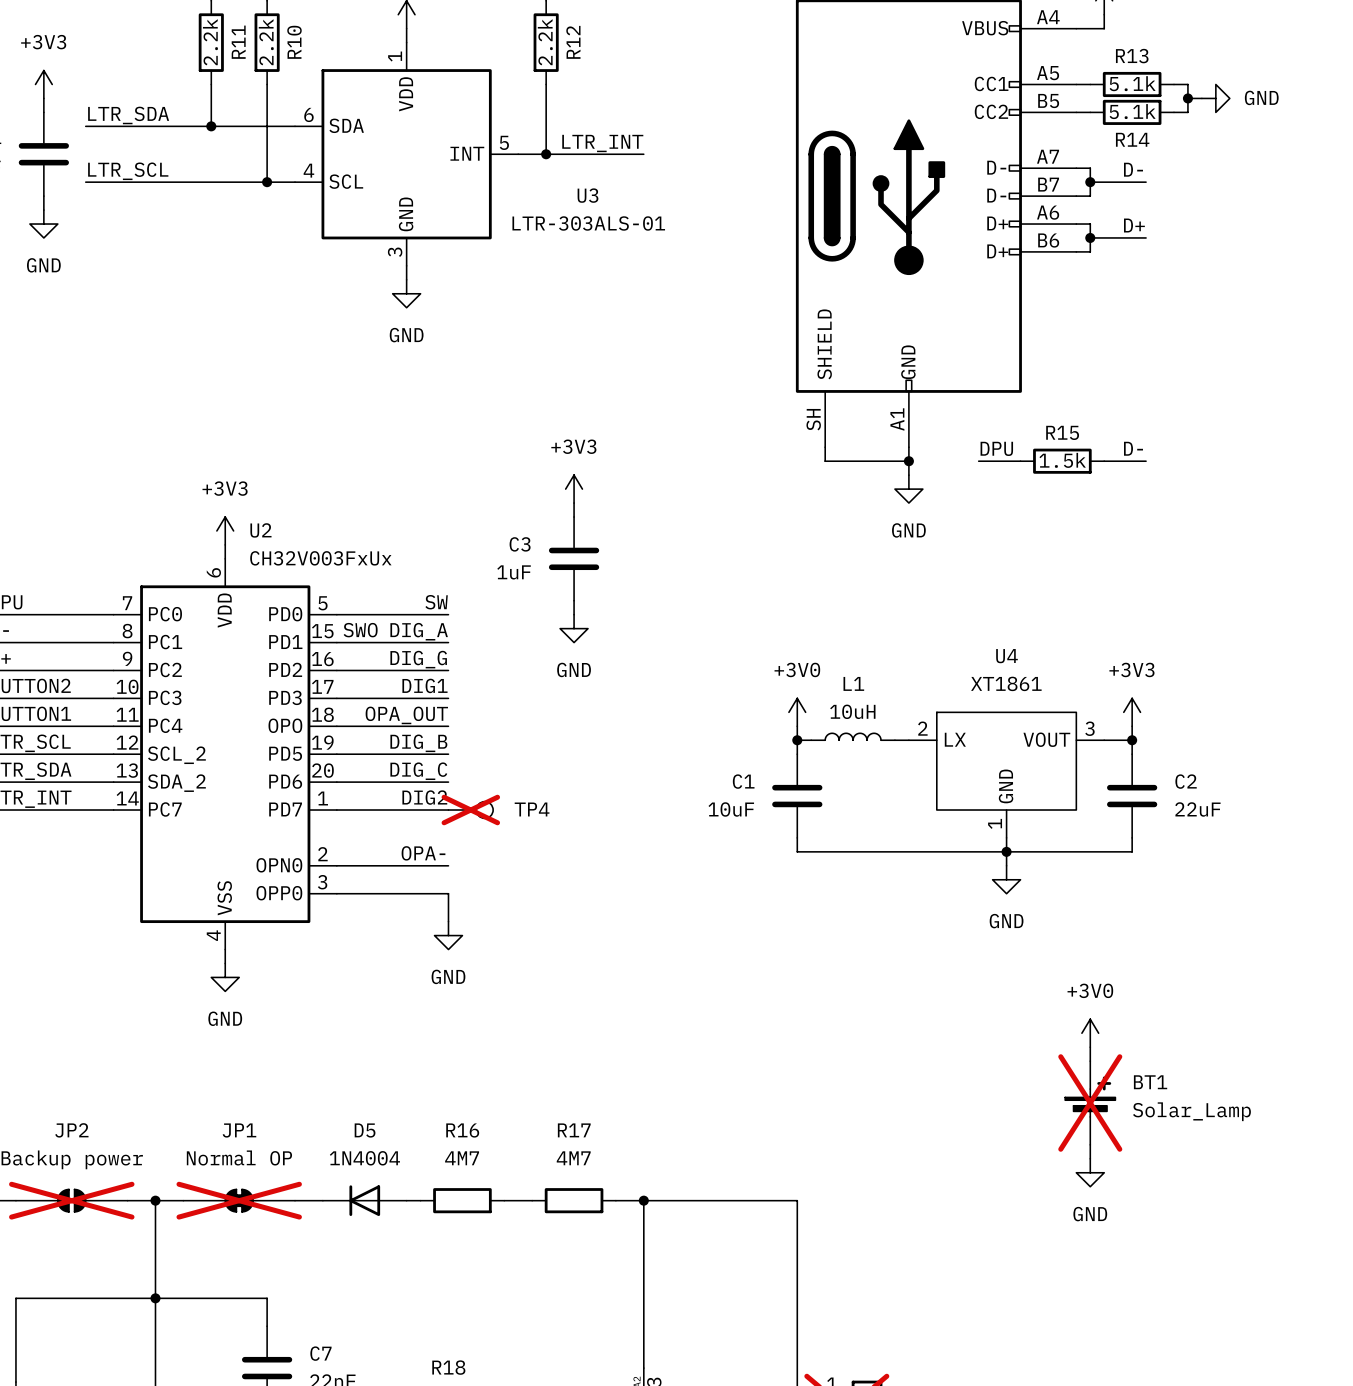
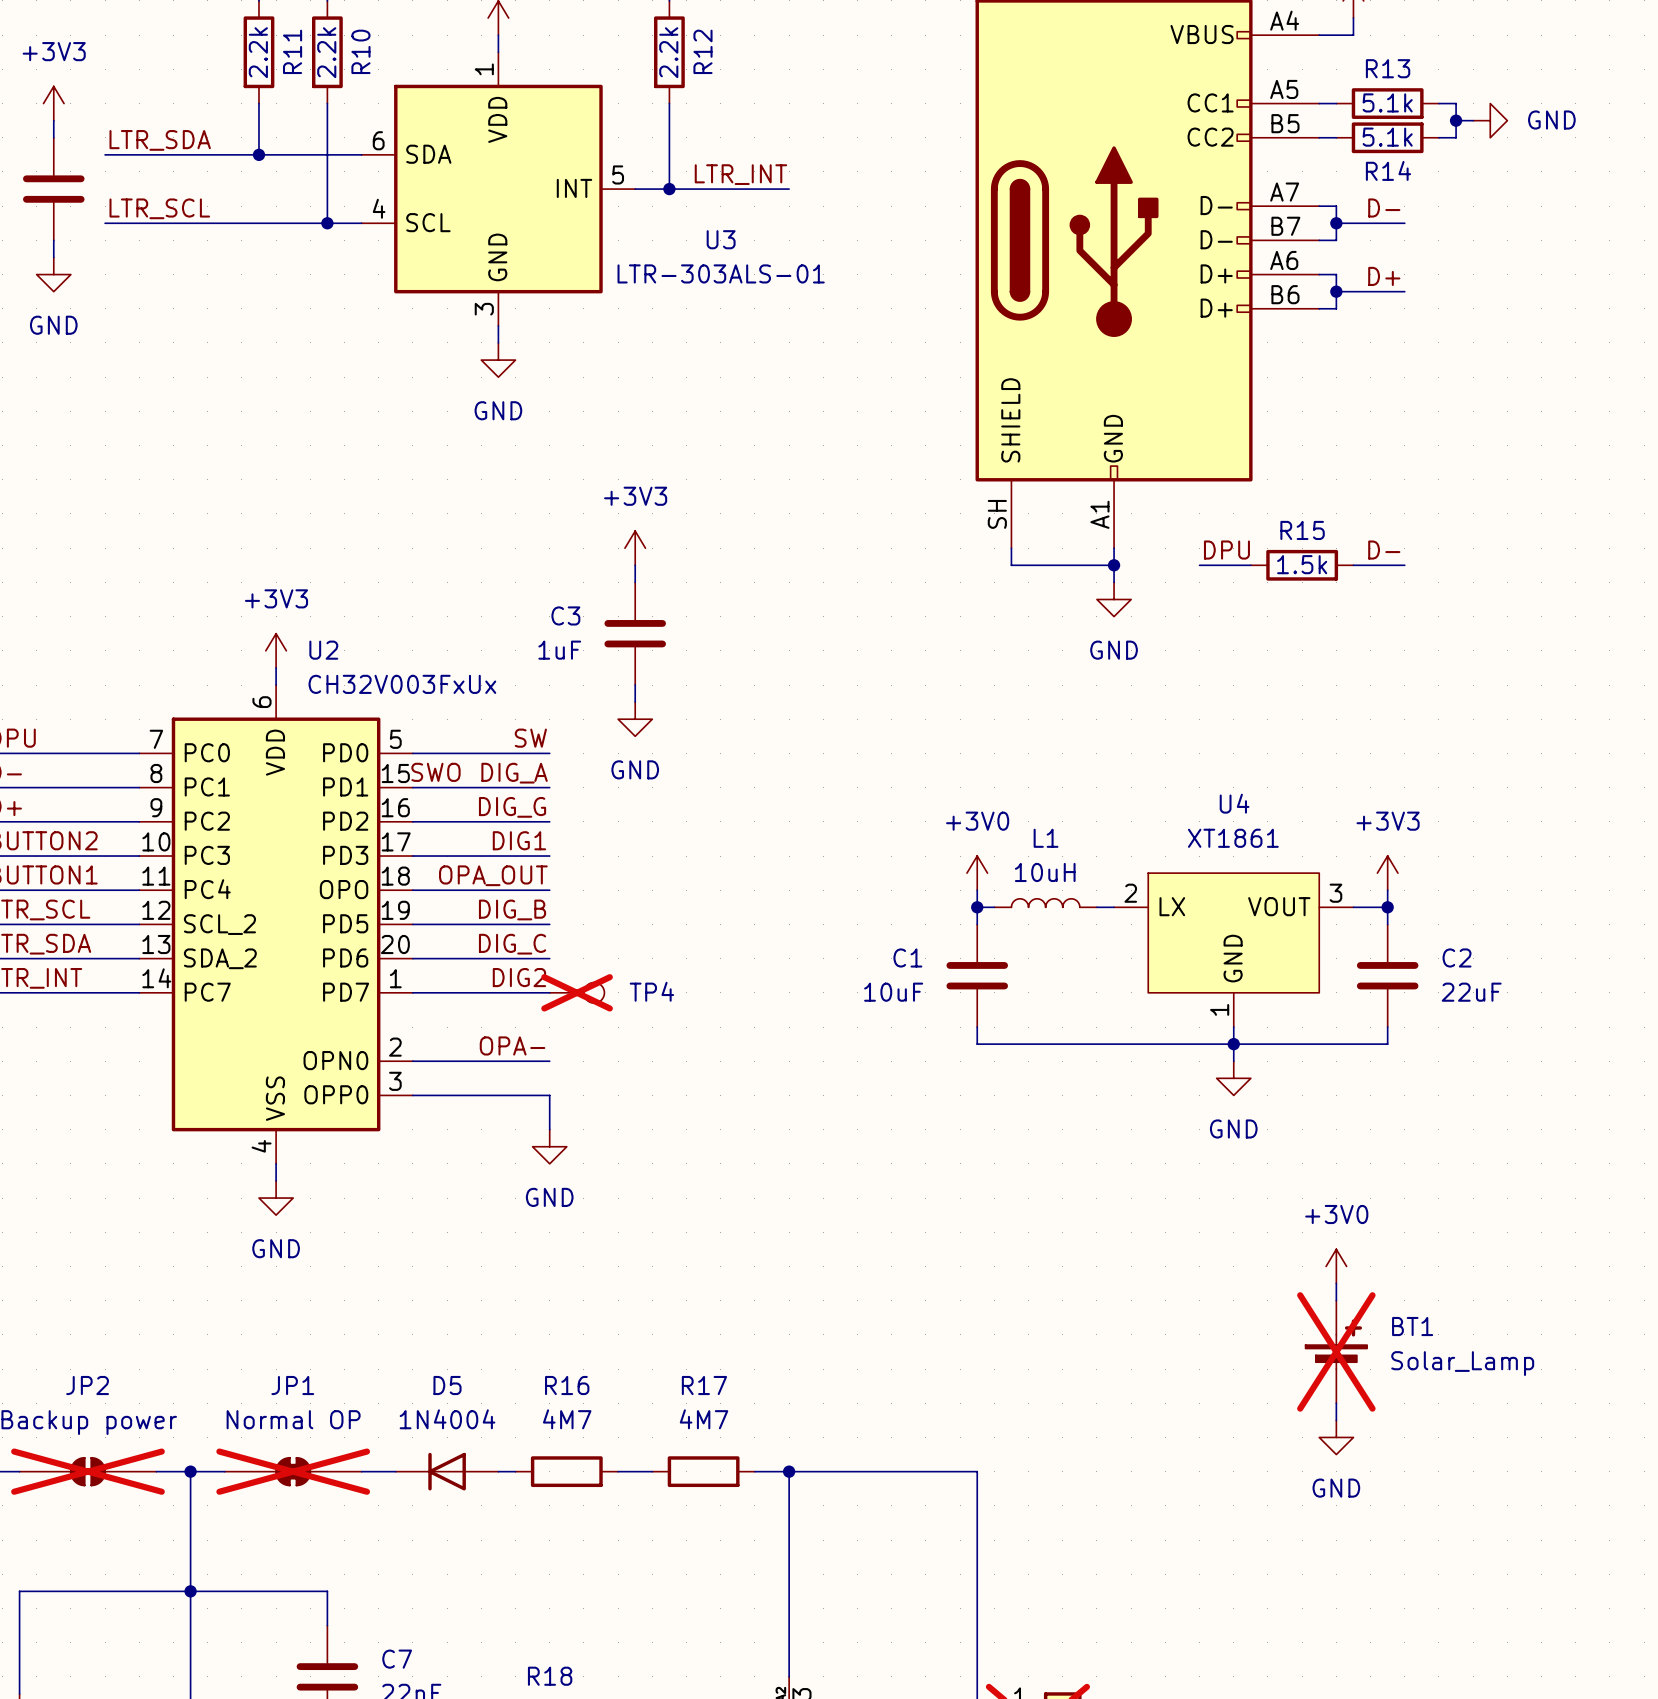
power symbol position: +3V3 (574, 489) -> +3V3 (635, 548)
wire: (574, 503) (574, 517) -> (635, 565) (635, 582)
C3 position: (574, 558) -> (635, 633)
wire: (574, 600) (574, 614) -> (635, 685) (635, 702)
power symbol position: GND (574, 628) -> GND (635, 719)

